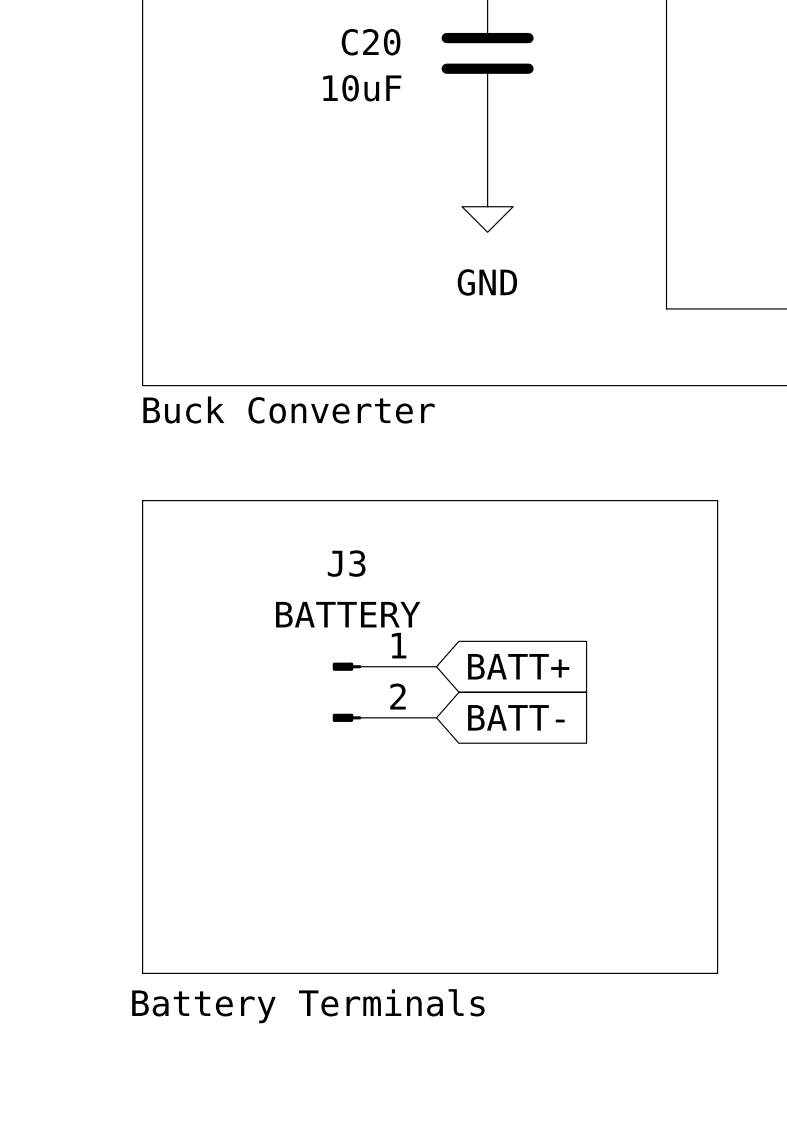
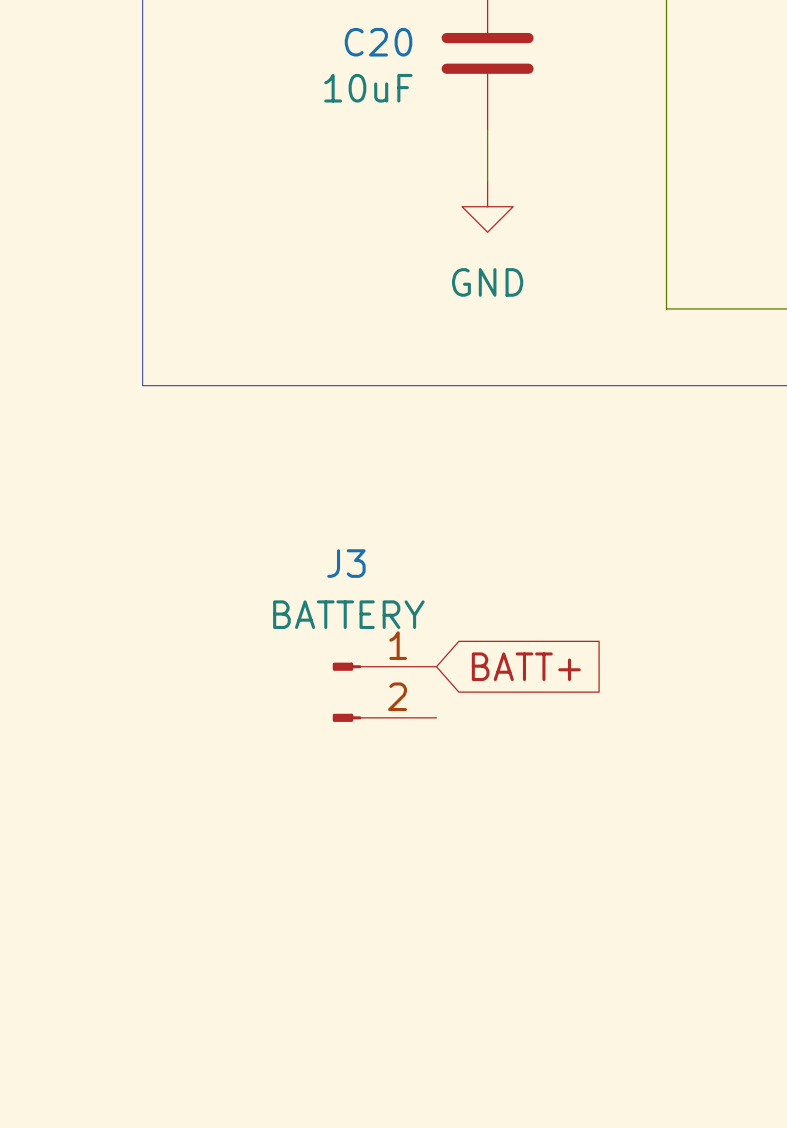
text: Buck Converter (289, 410) -> none
line: (142, 500) (717, 500) (717, 973) (142, 973) (142, 500) -> none
global label: BATT- (516, 717) -> none
text: Battery Terminals (308, 1006) -> none

